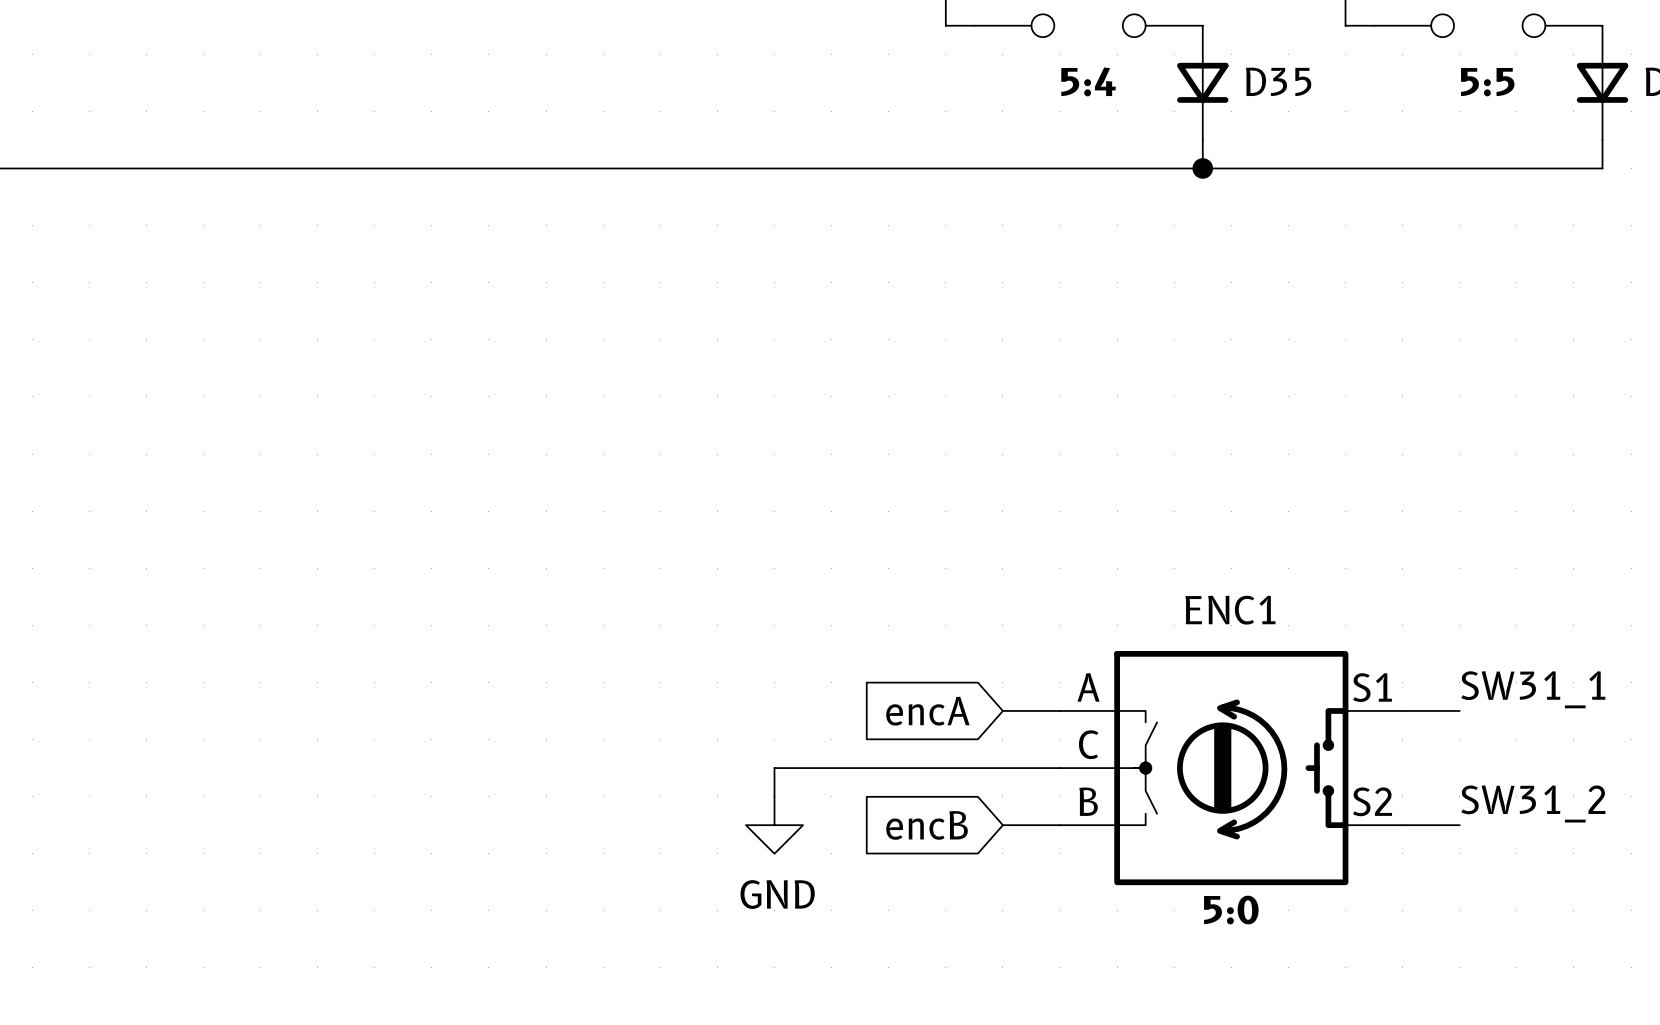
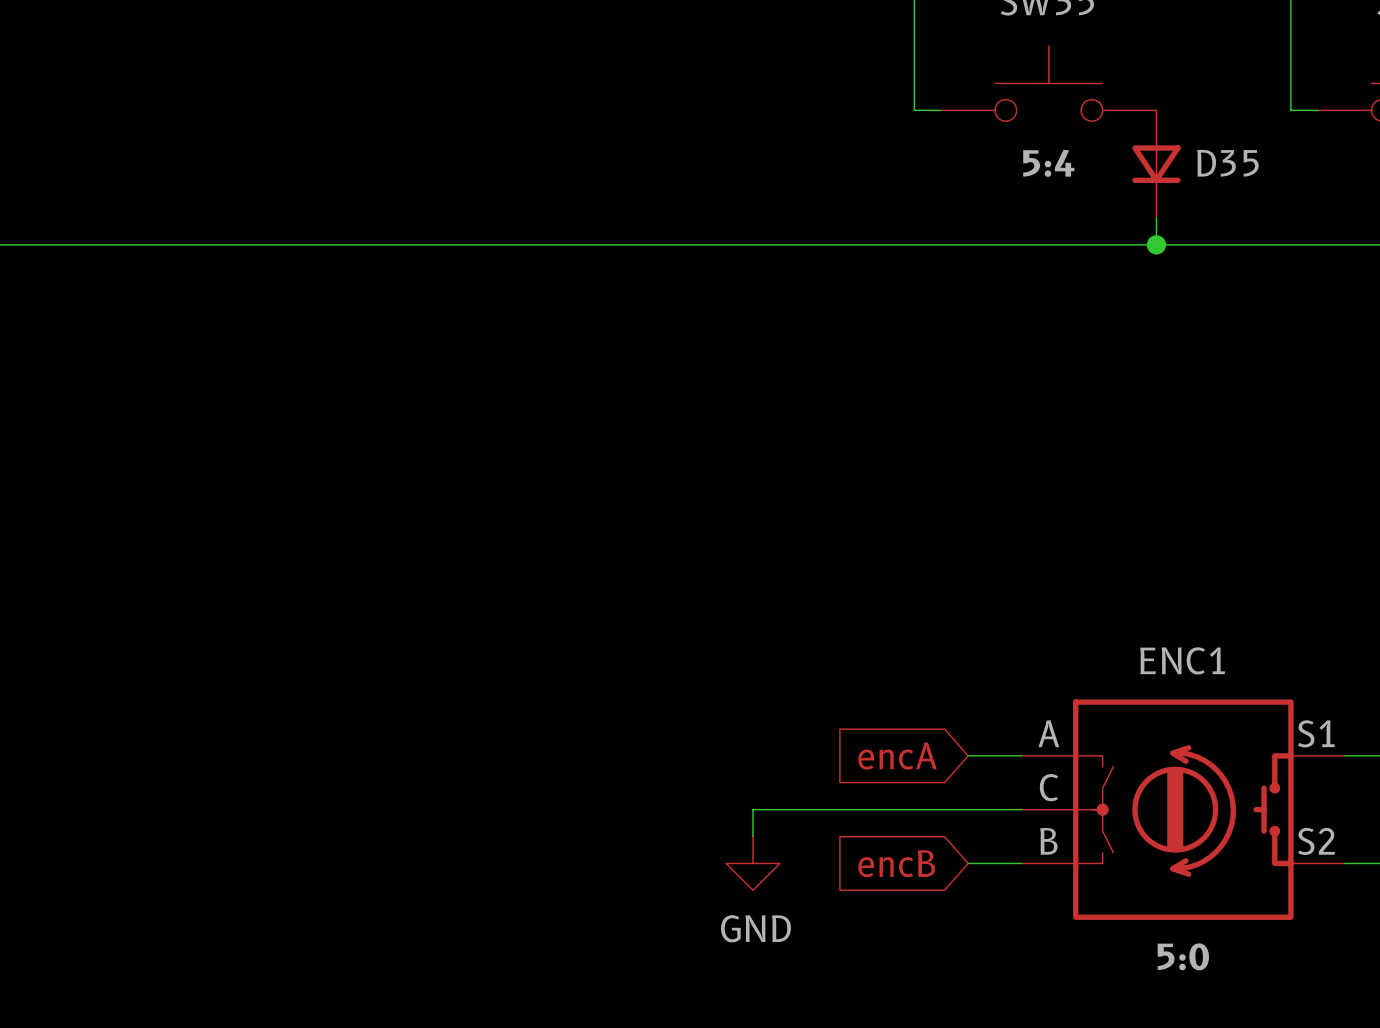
ENC1 value position: 5:0 (1231, 910) -> 5:0 (1183, 956)

